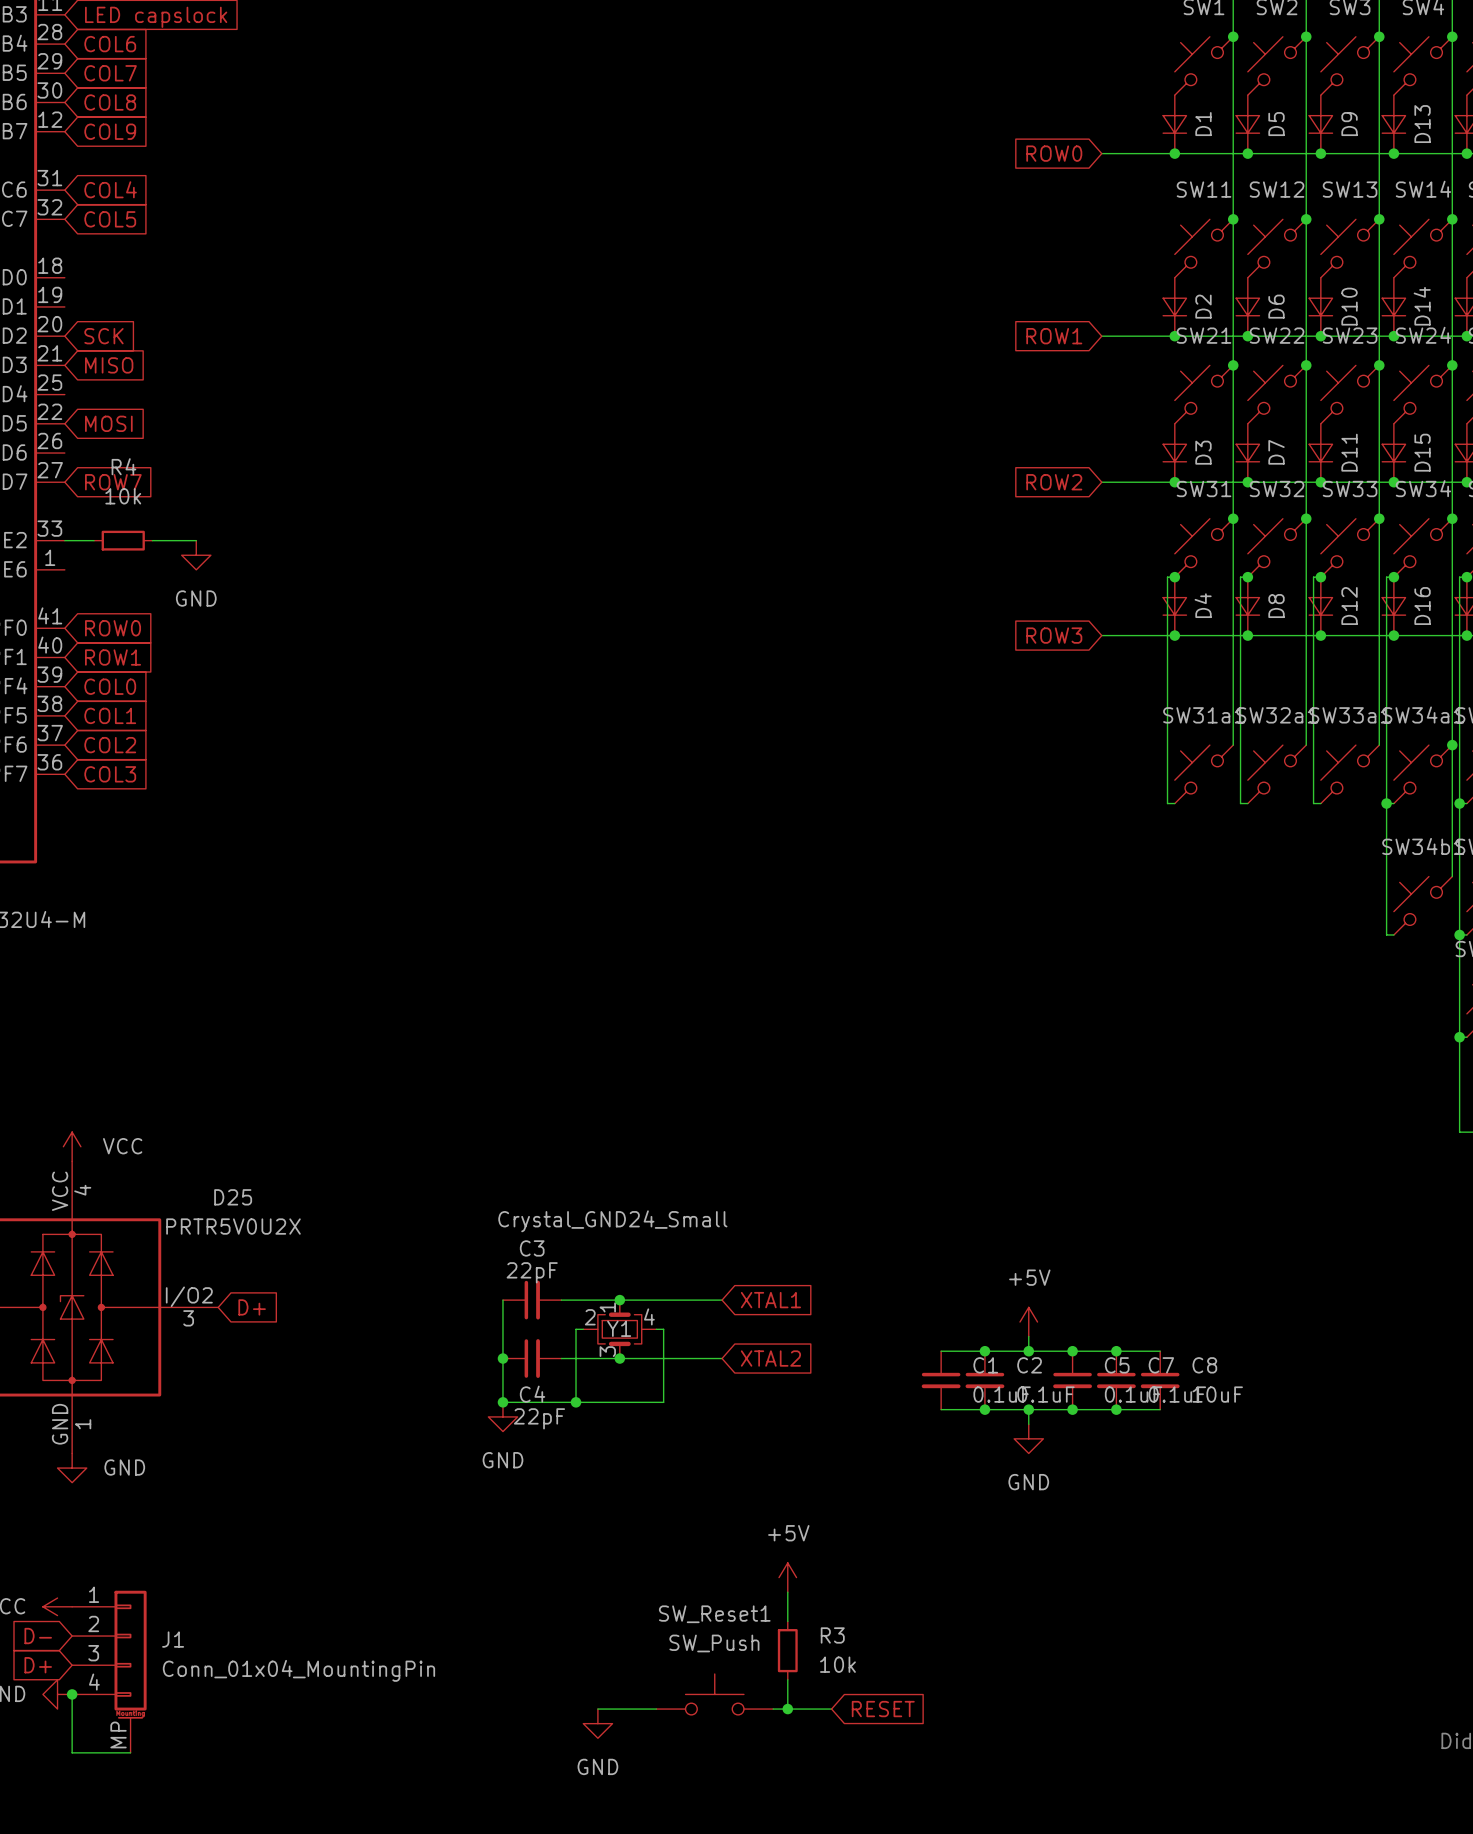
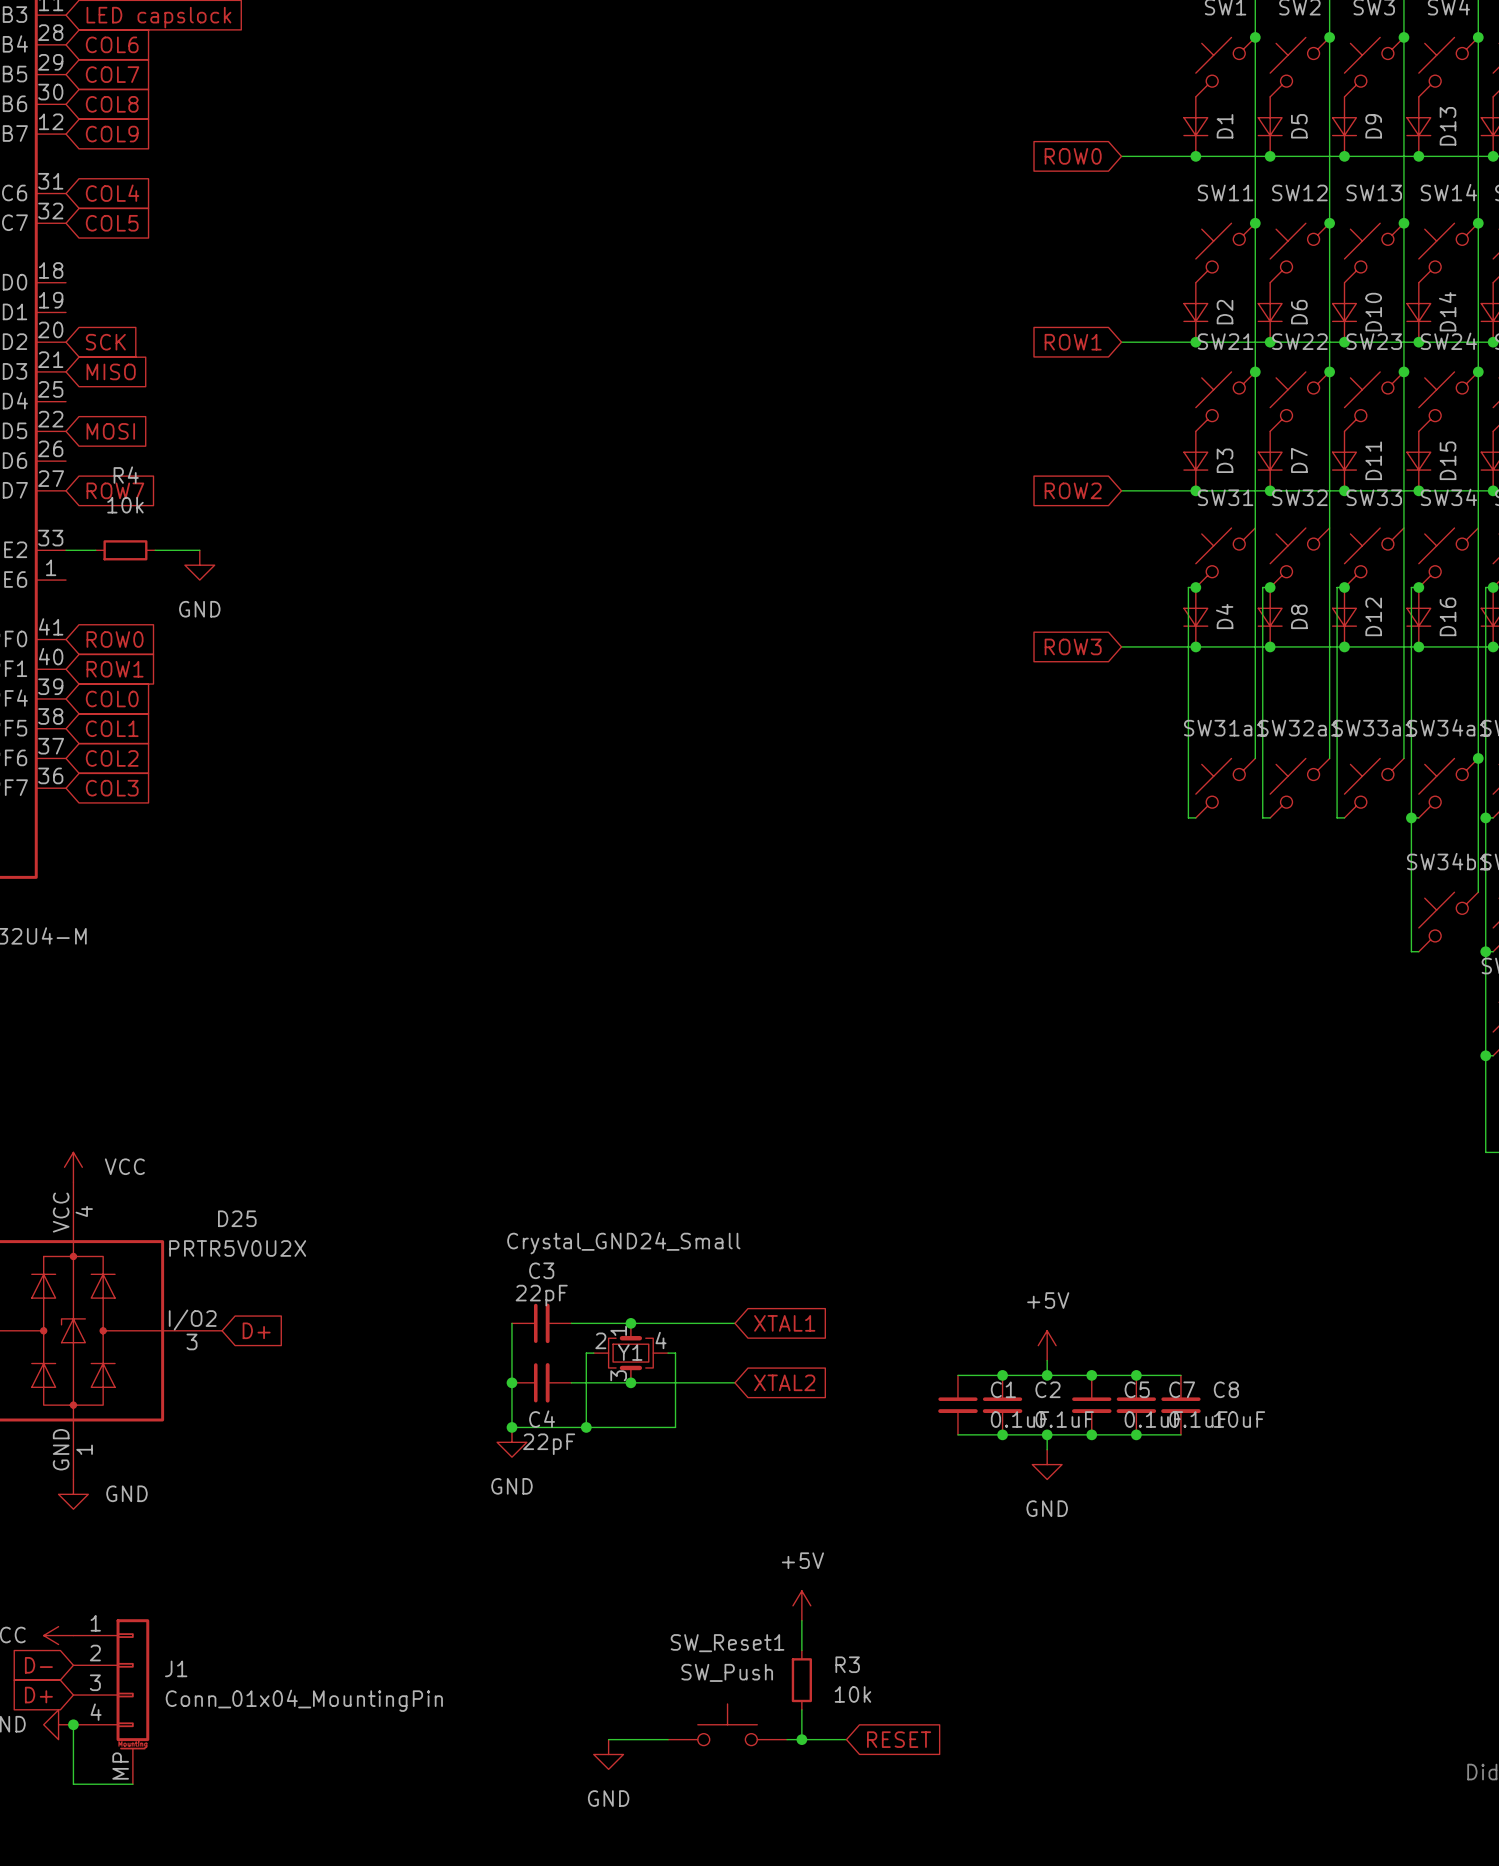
junction: (1233, 518) -> none
junction: (1306, 518) -> none
junction: (1379, 518) -> none
junction: (1452, 518) -> none

